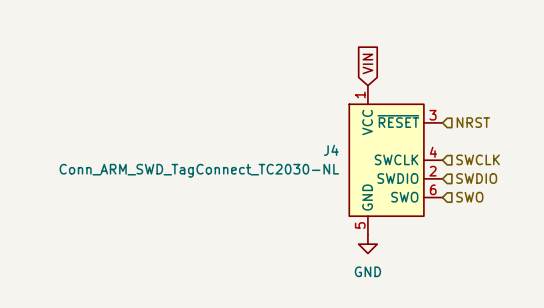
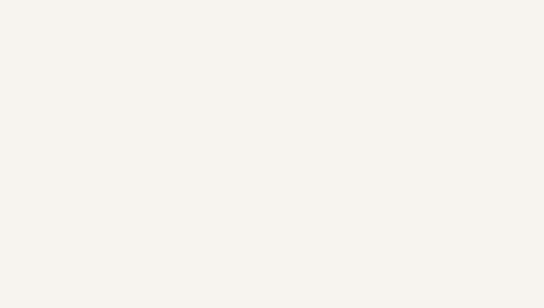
global label: VIN (367, 63) -> none
hierarchical label: NRST (473, 122) -> none
hierarchical label: SWCLK (478, 159) -> none
J4: Conn_ARM_SWD_TagConnect_TC2030-NL (395, 160) -> none
hierarchical label: SWDIO (476, 178) -> none
hierarchical label: SWO (469, 197) -> none
power symbol: GND (367, 244) -> none

